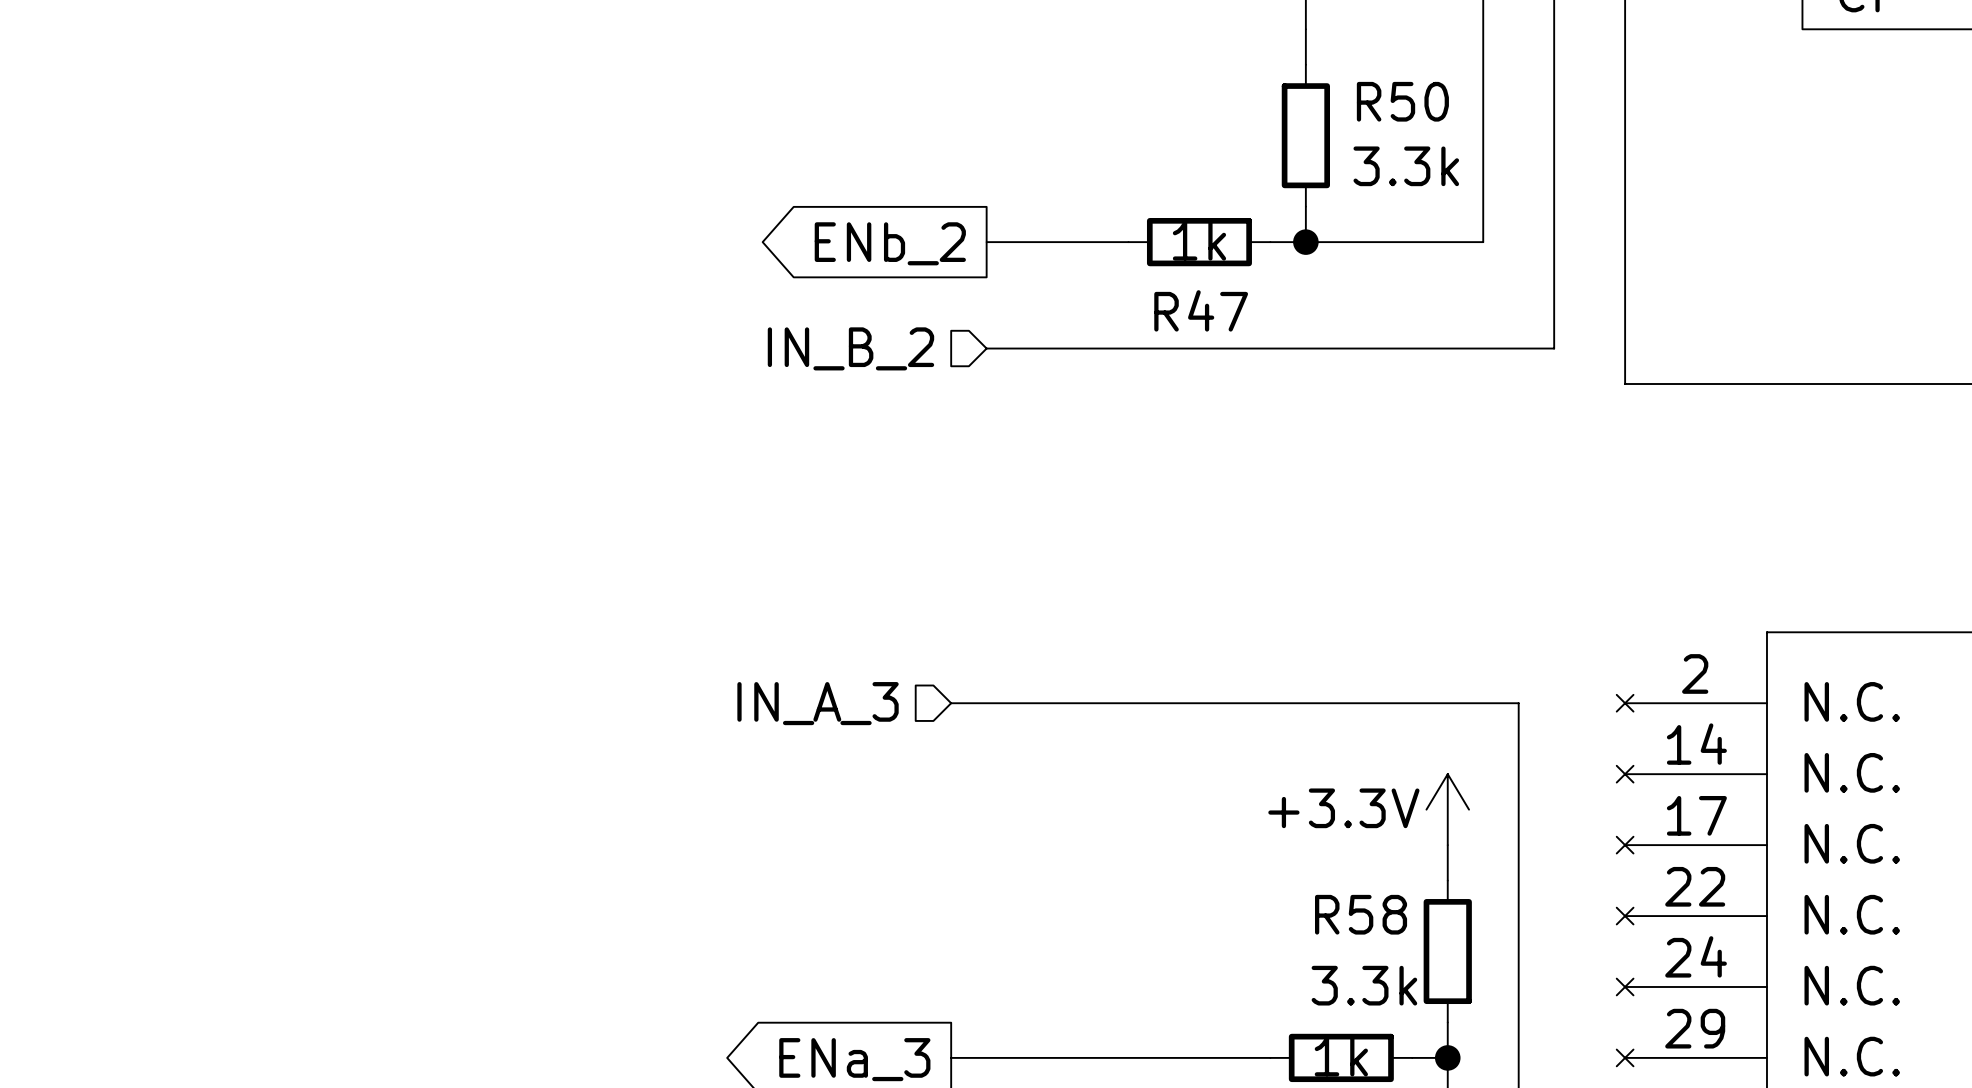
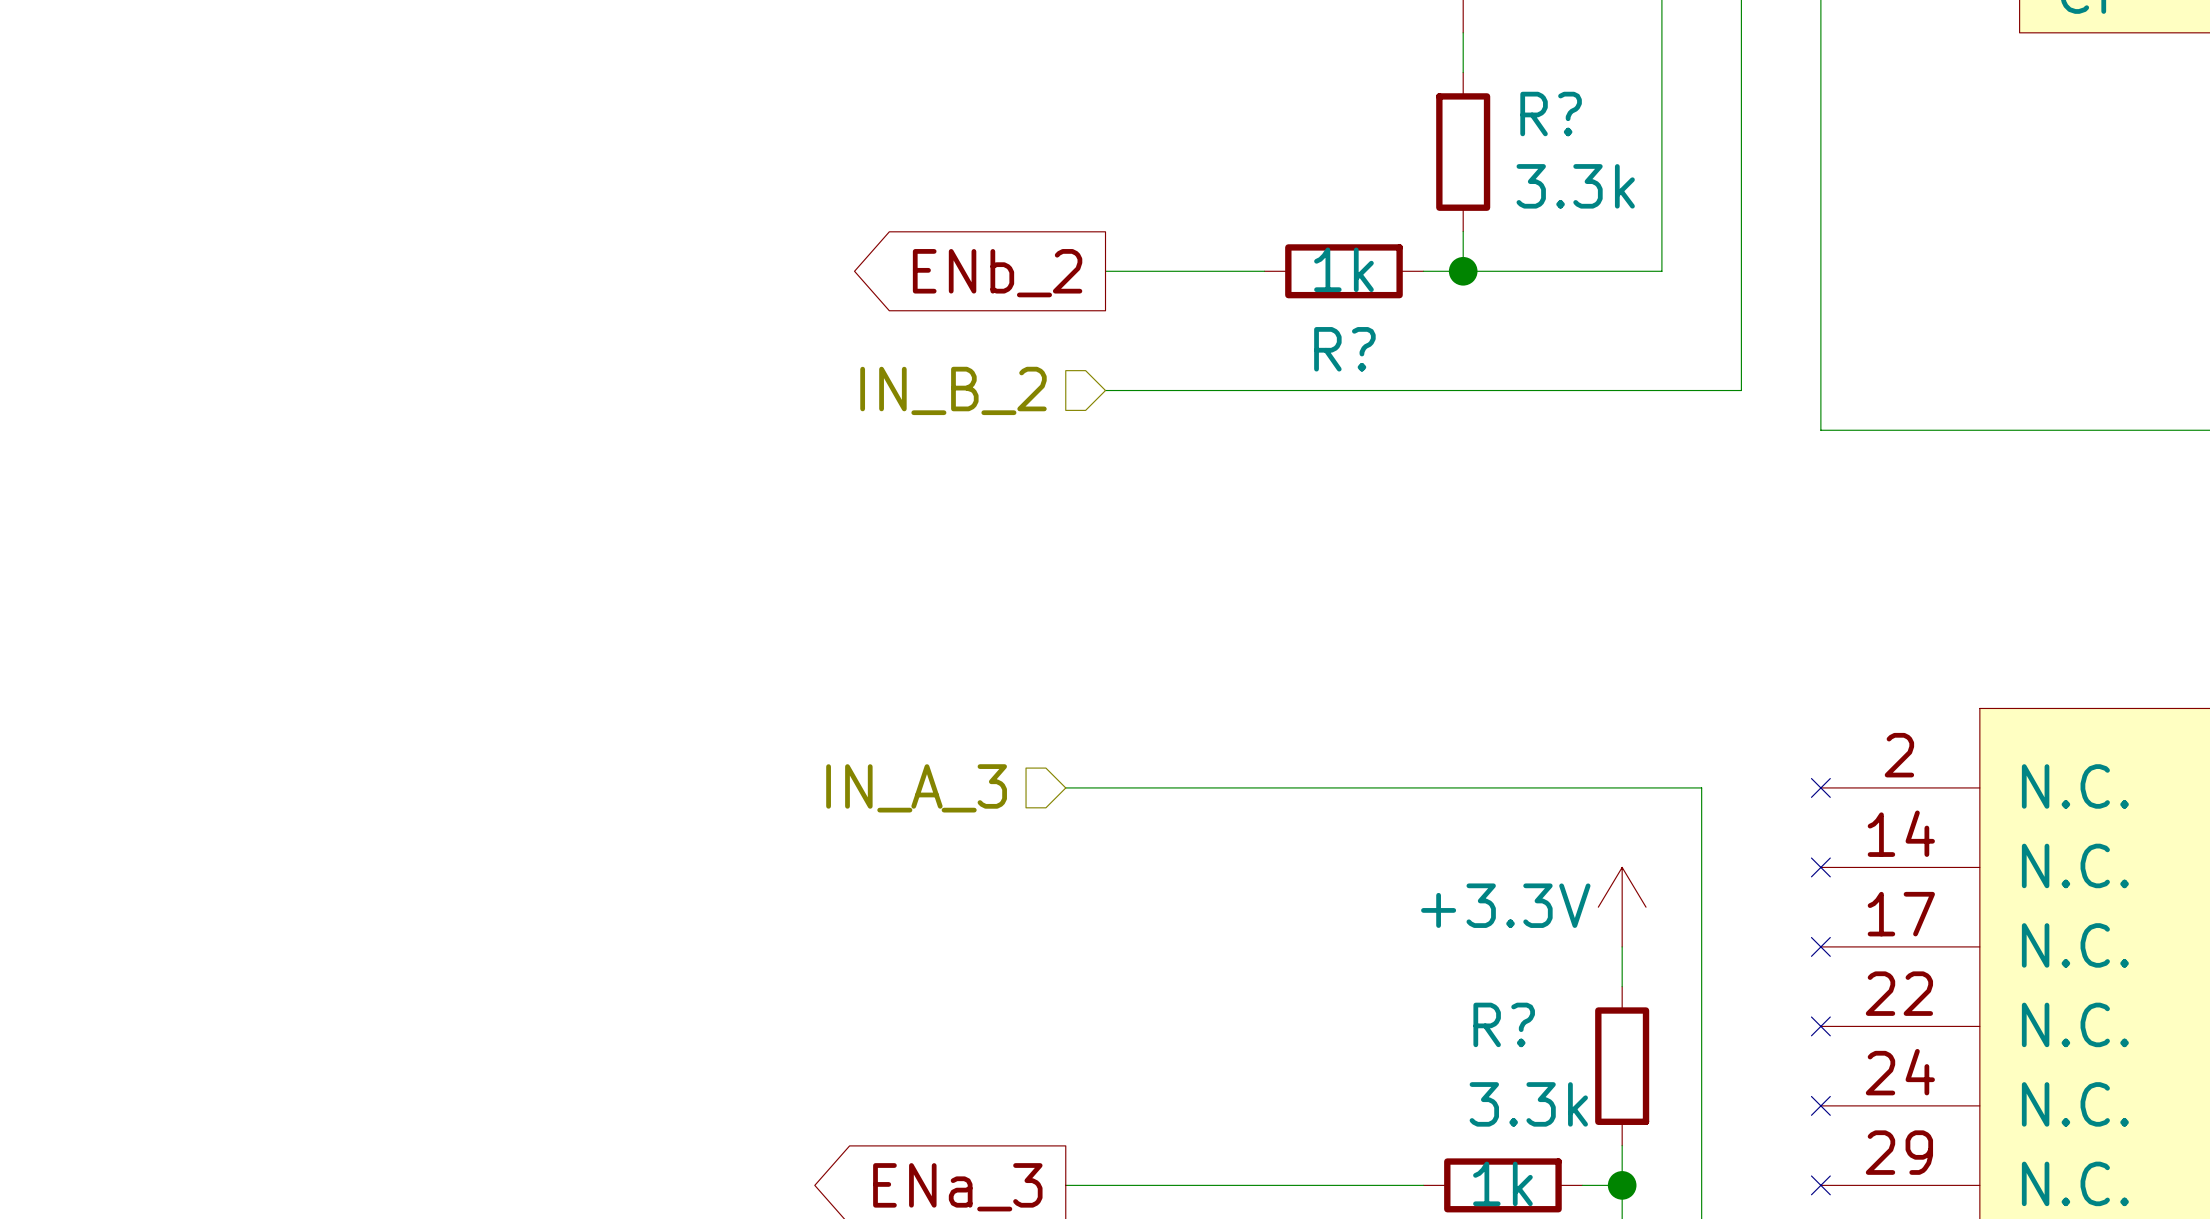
R50 name: R50 (1402, 101) -> R? (1551, 114)
R47 name: R47 (1201, 310) -> R? (1344, 349)
R58 name: R58 (1361, 914) -> R? (1504, 1024)

